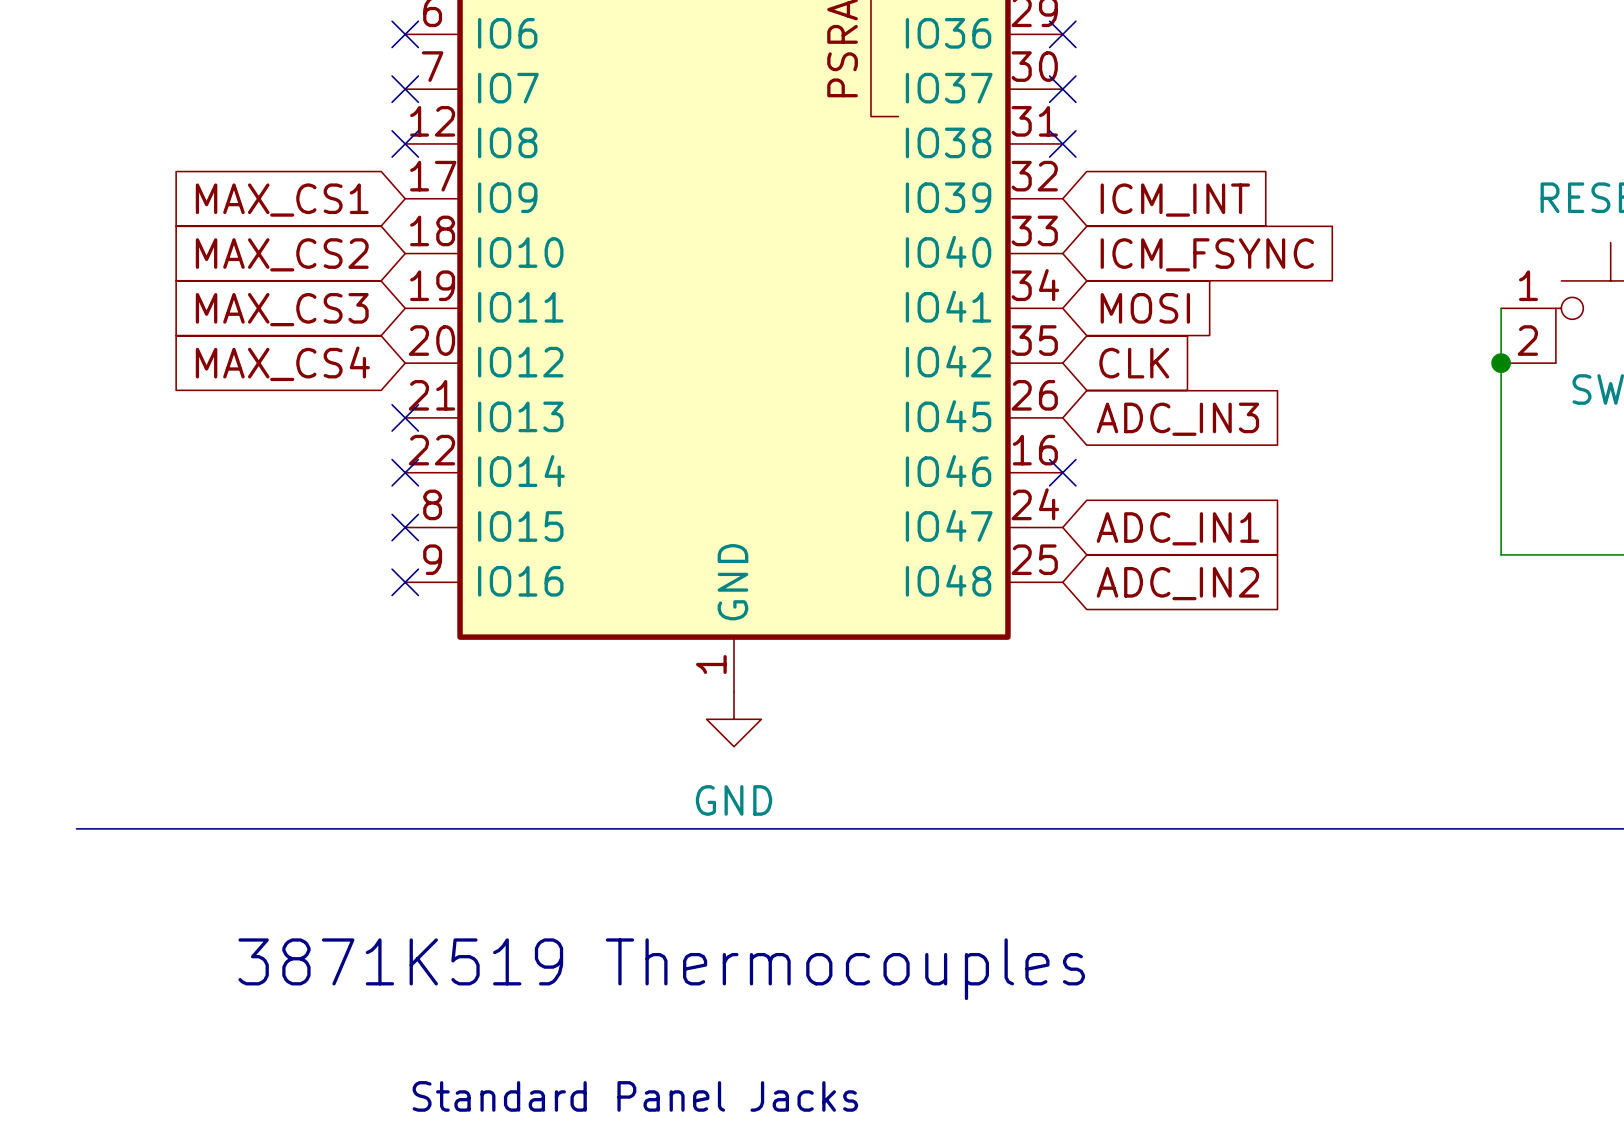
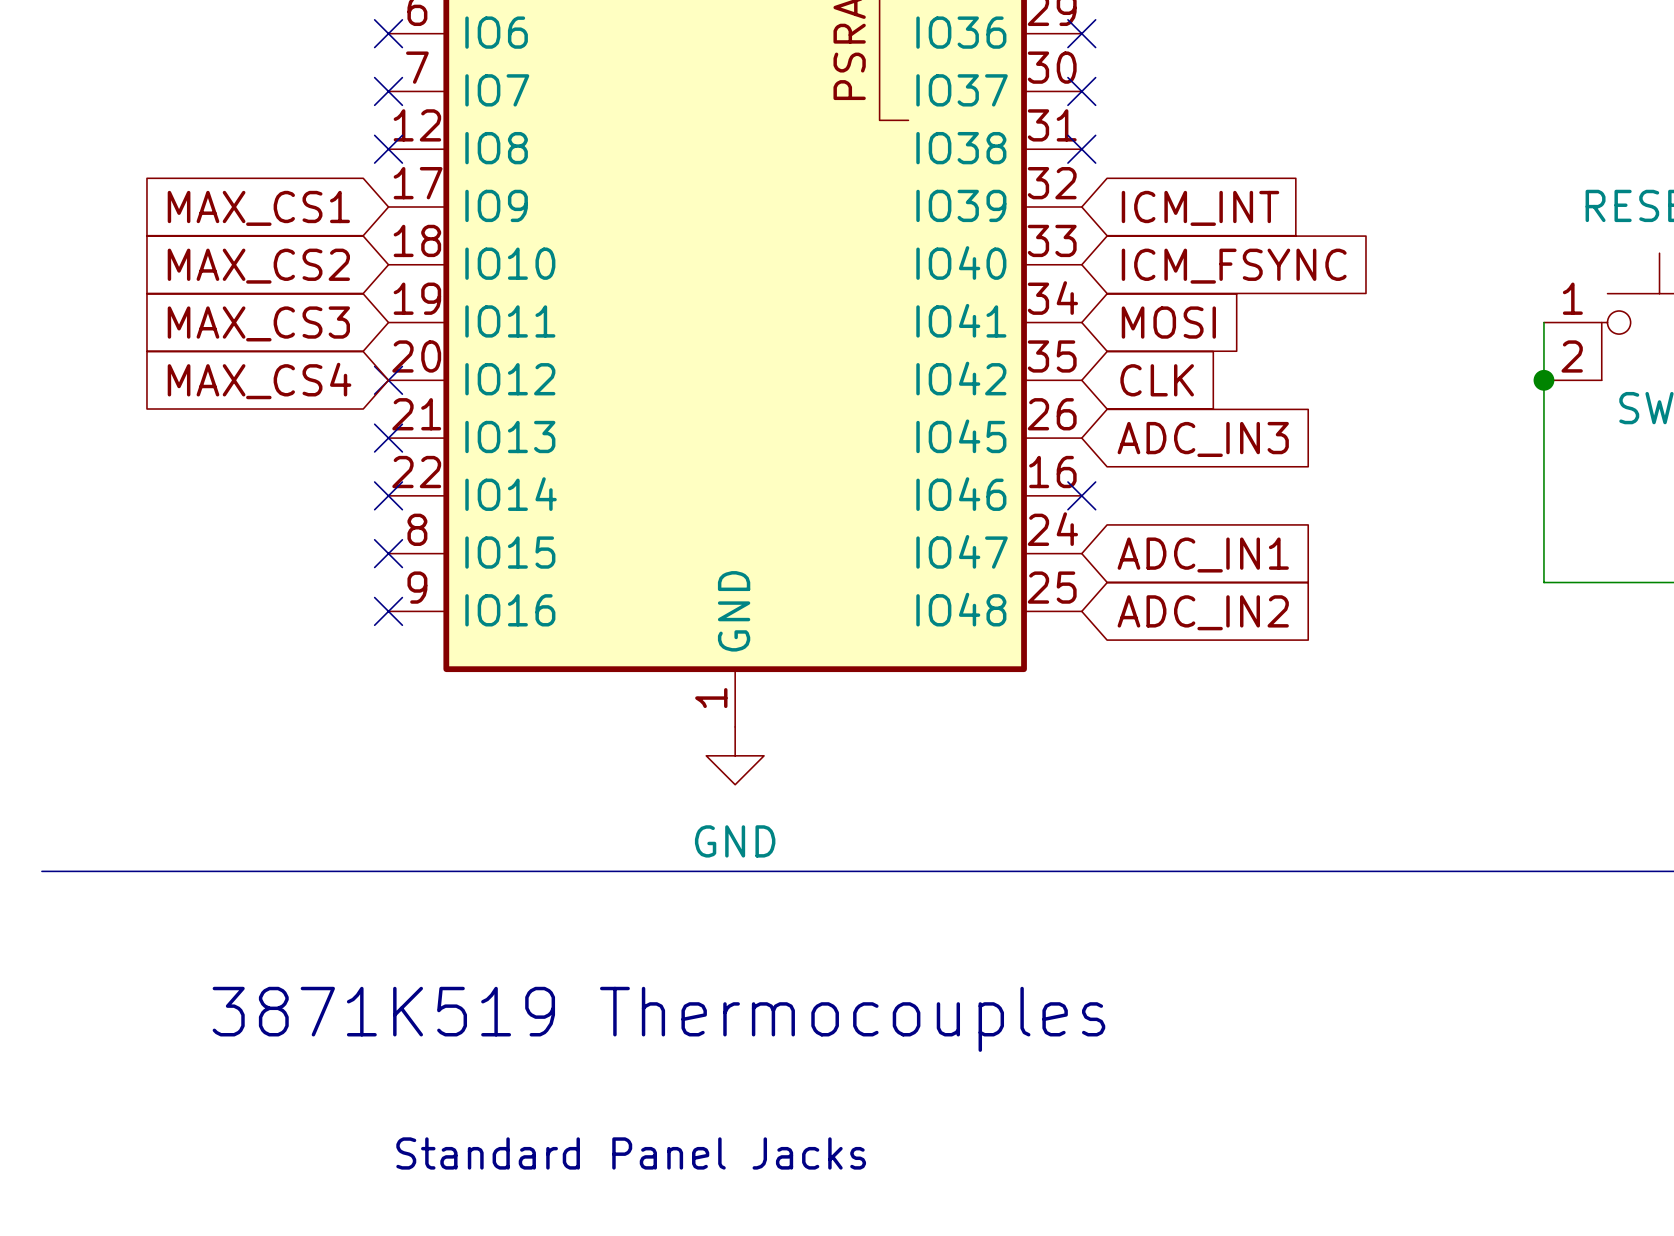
no-connect mark: none -> (388, 380)

